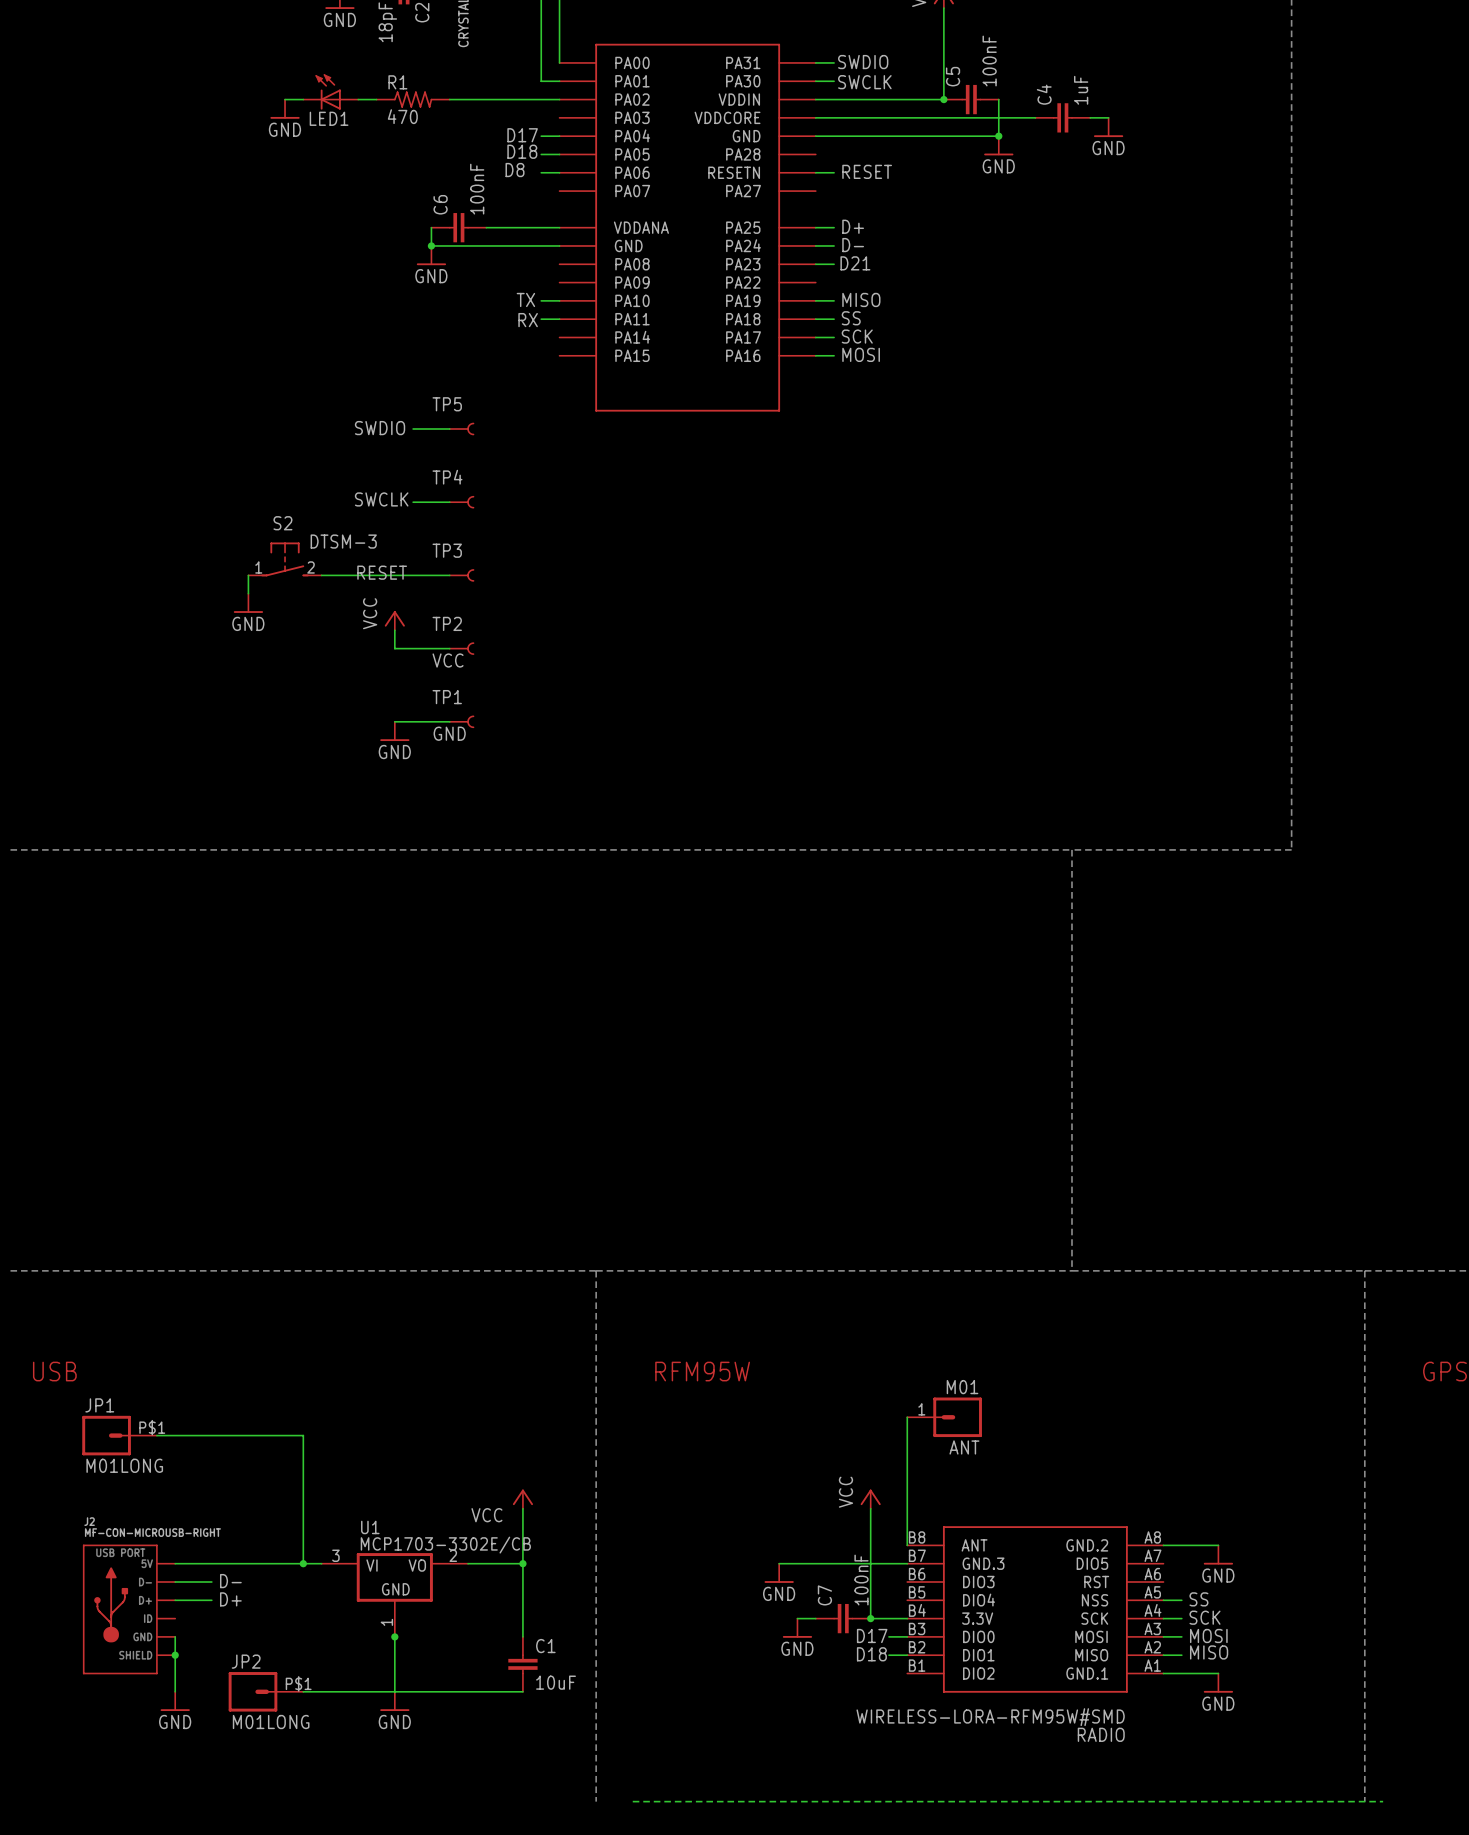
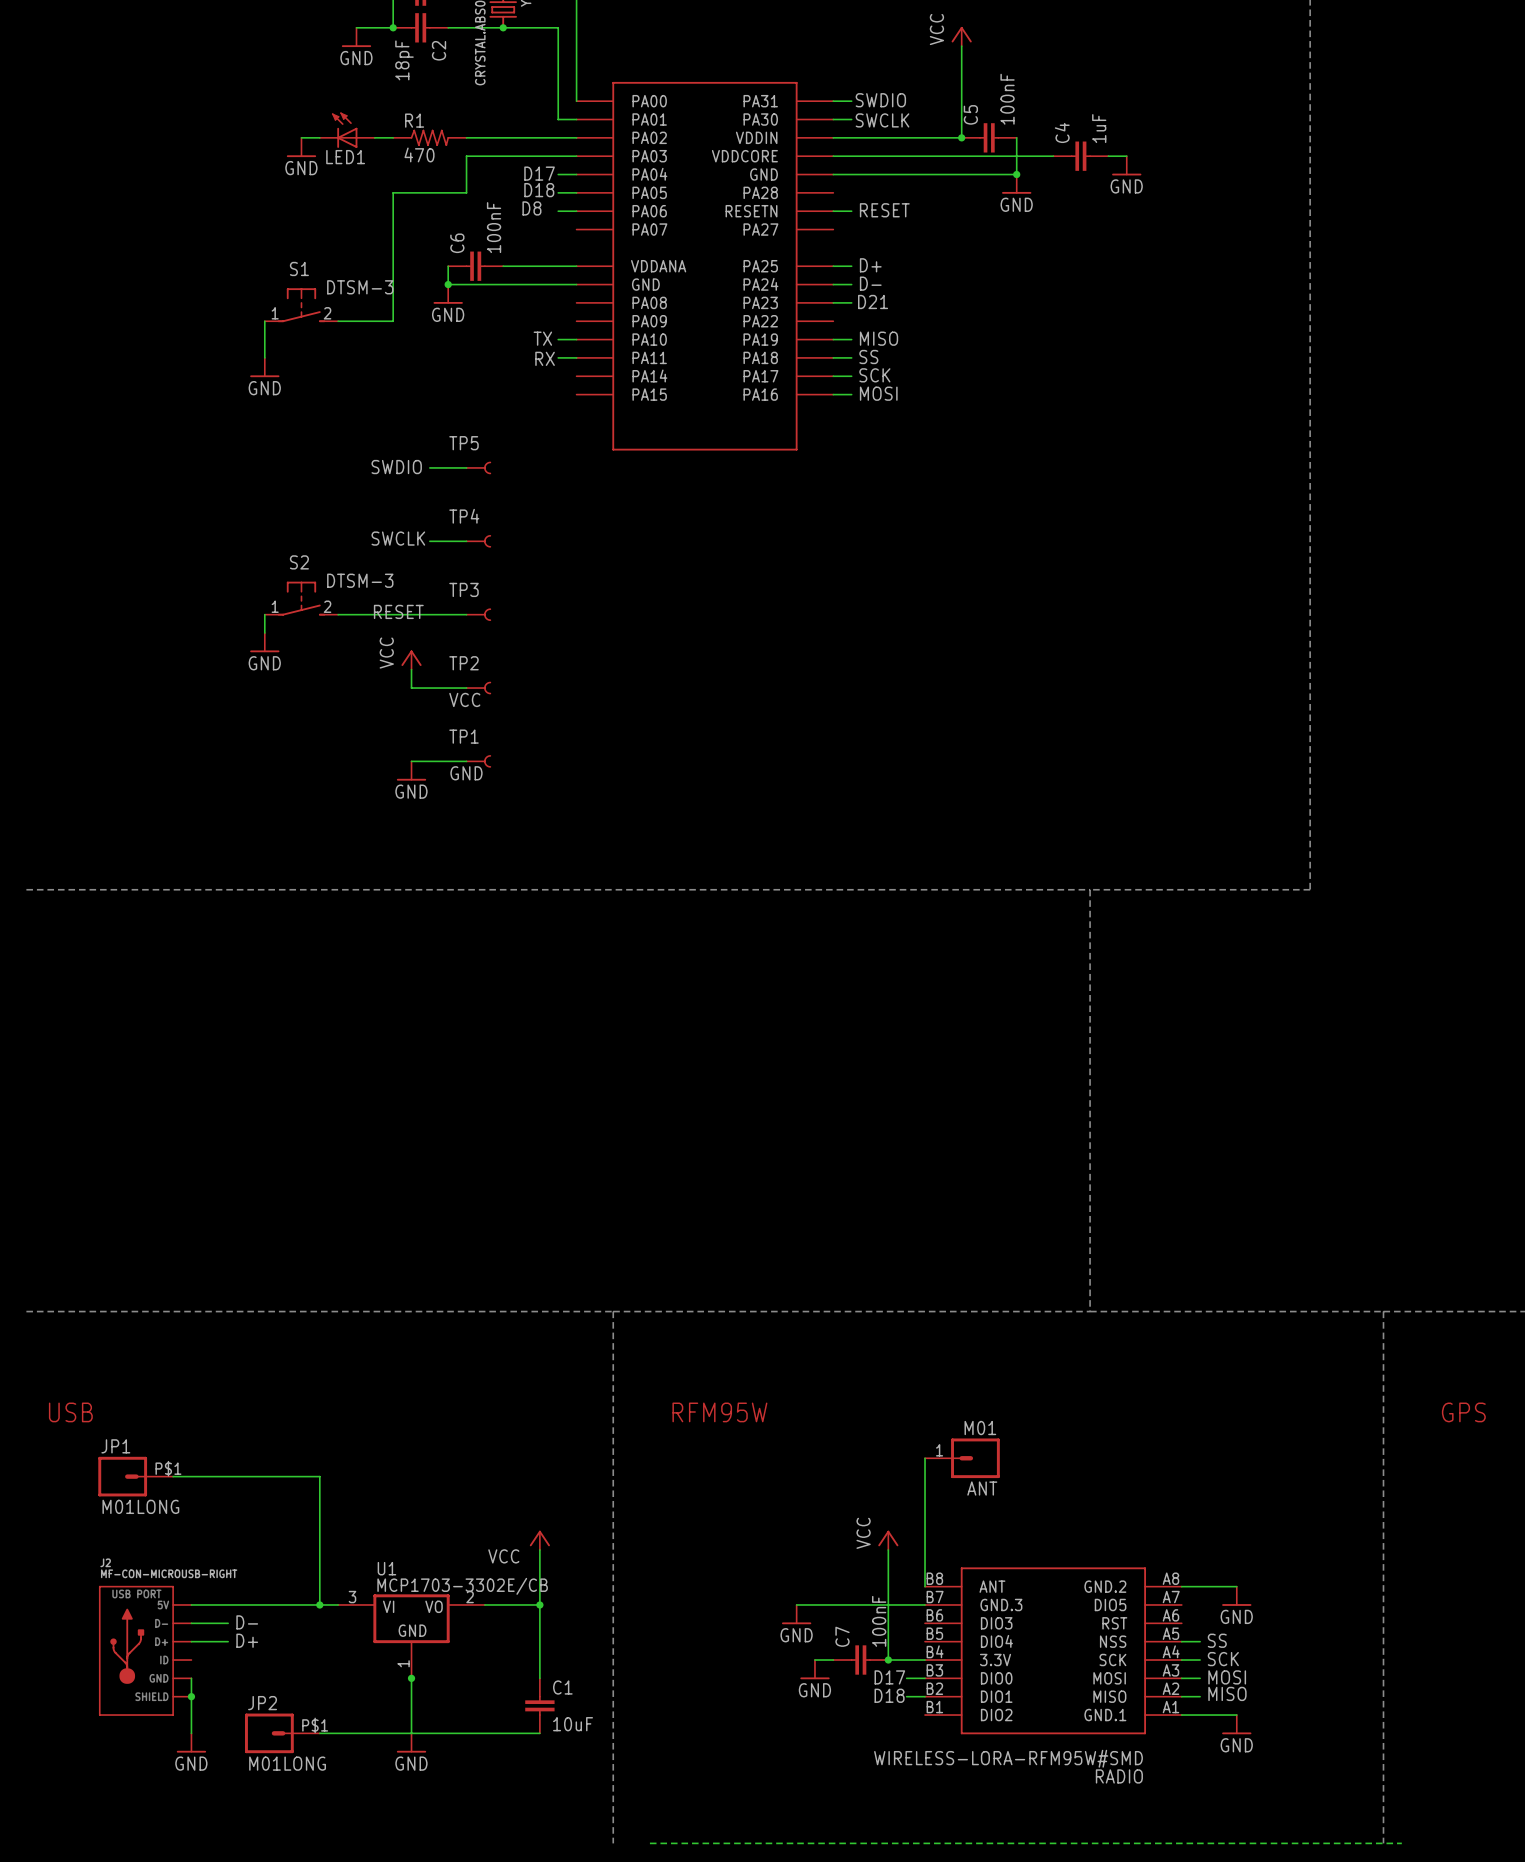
wire: none -> (576, 156) (466, 156) (466, 192) (393, 192) (393, 321) (338, 321)
S1: none -> DTSM-3 (301, 305)
wire: none -> (264, 321) (264, 357)
power symbol: none -> GND (264, 367)

